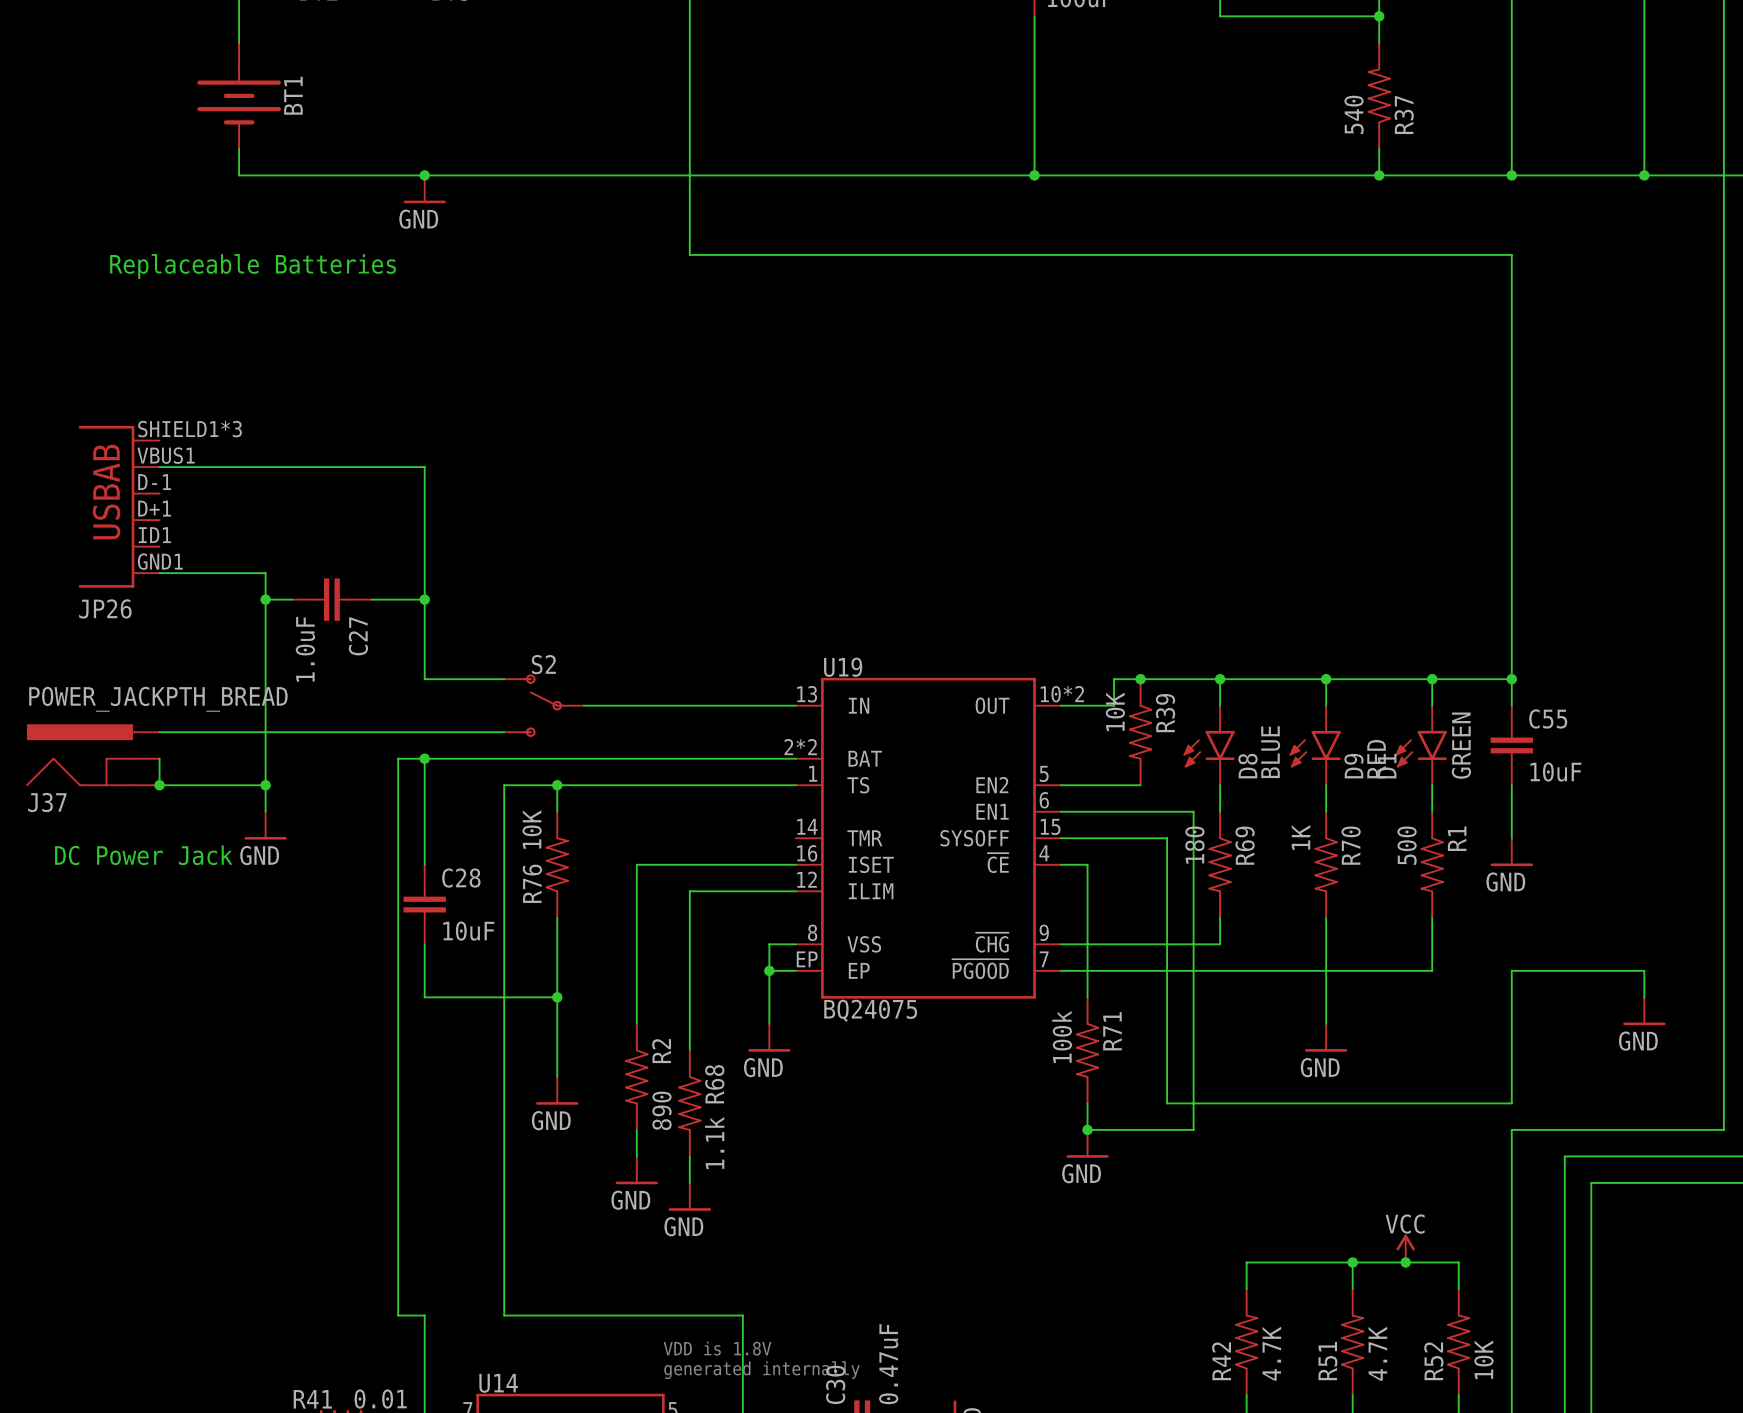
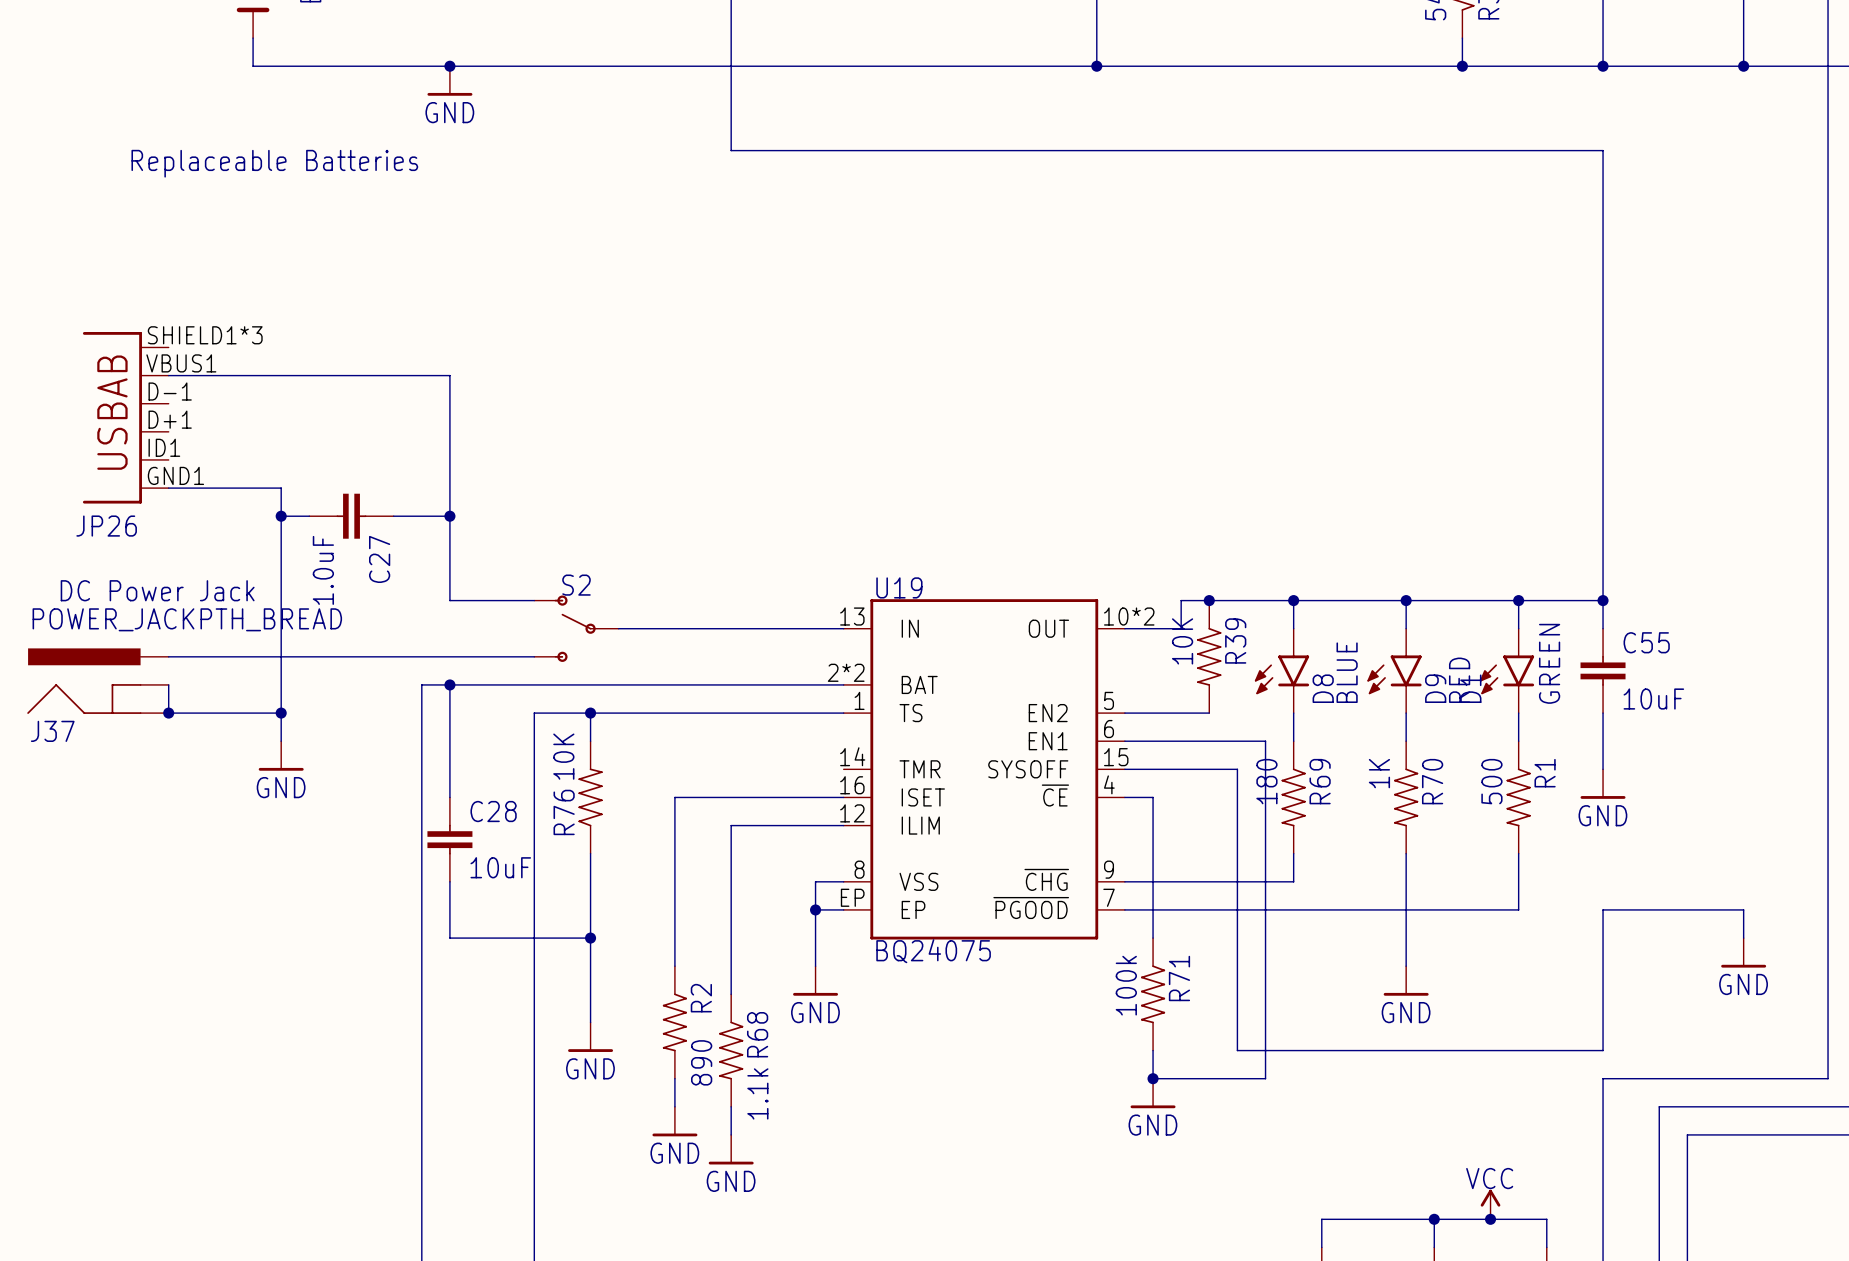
text position: DC Power Jack (143, 855) -> DC Power Jack (157, 590)

